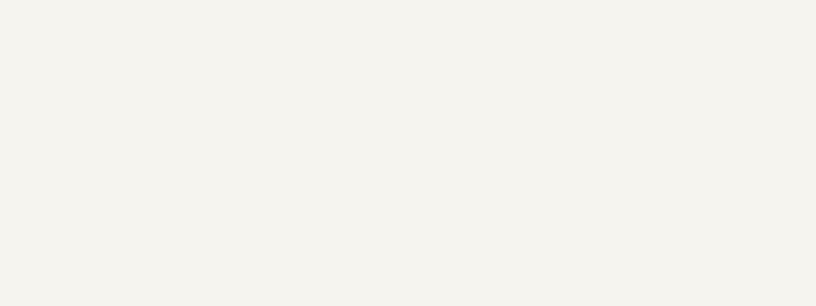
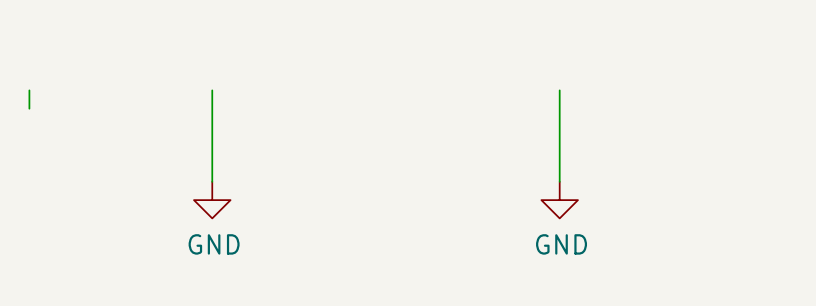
wire: none -> (29, 90) (29, 108)
wire: none -> (212, 90) (212, 181)
wire: none -> (559, 90) (559, 181)
power symbol: none -> GND (212, 200)
power symbol: none -> GND (559, 200)

